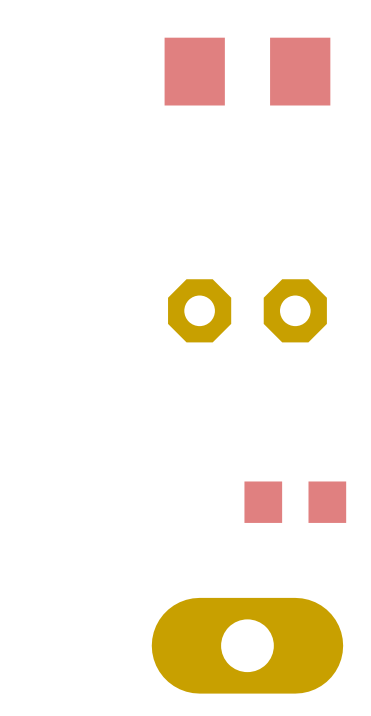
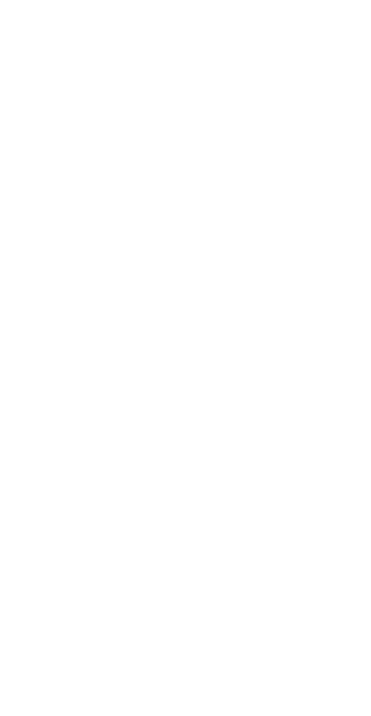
part: (247, 71) -> none
part: (247, 310) -> none
part: (295, 502) -> none
part: (247, 645) -> none

